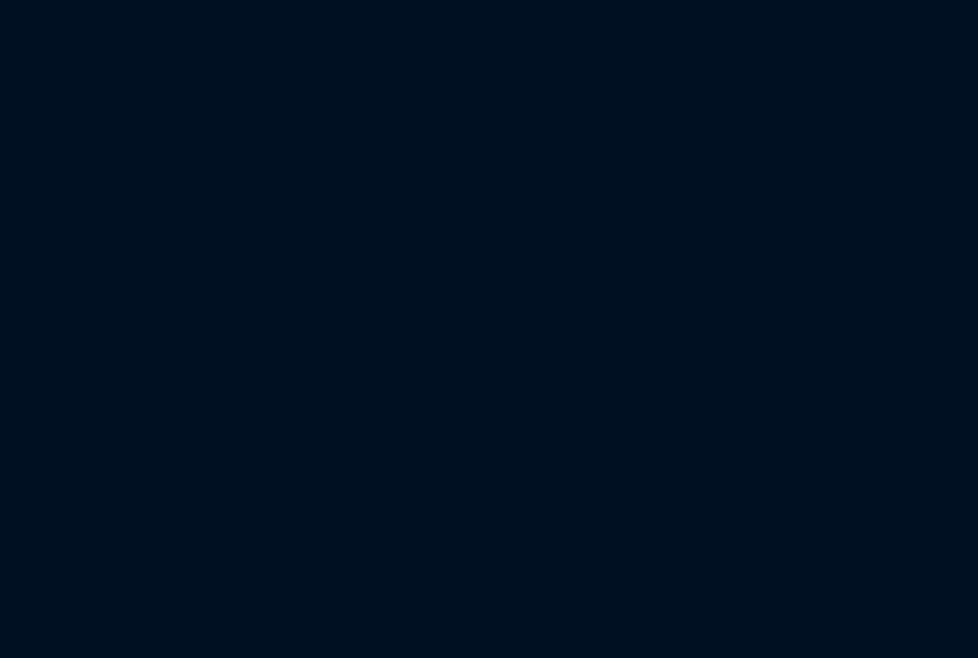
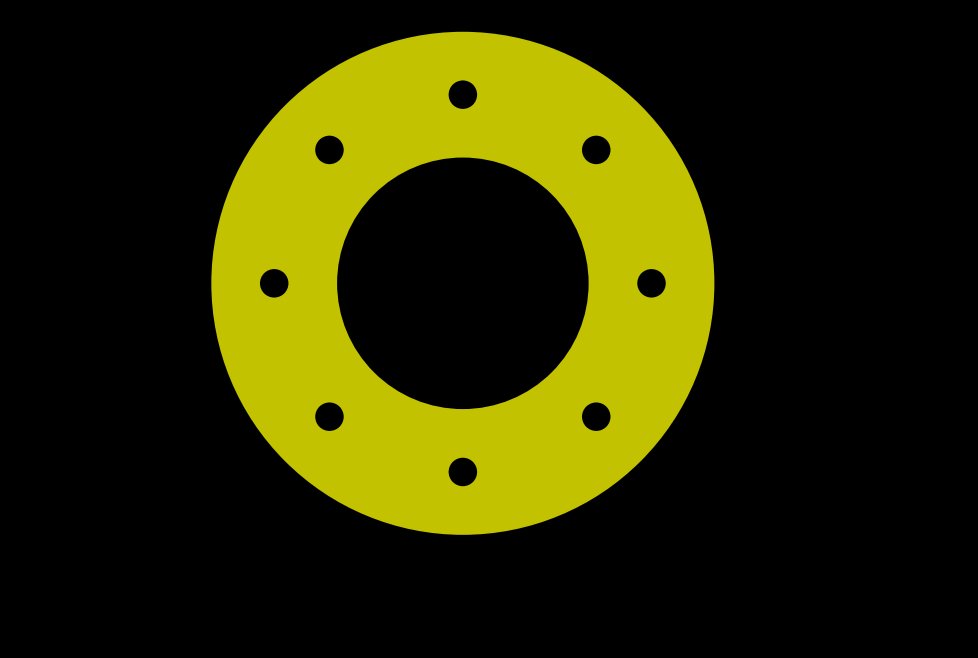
part: none -> (462, 283)

